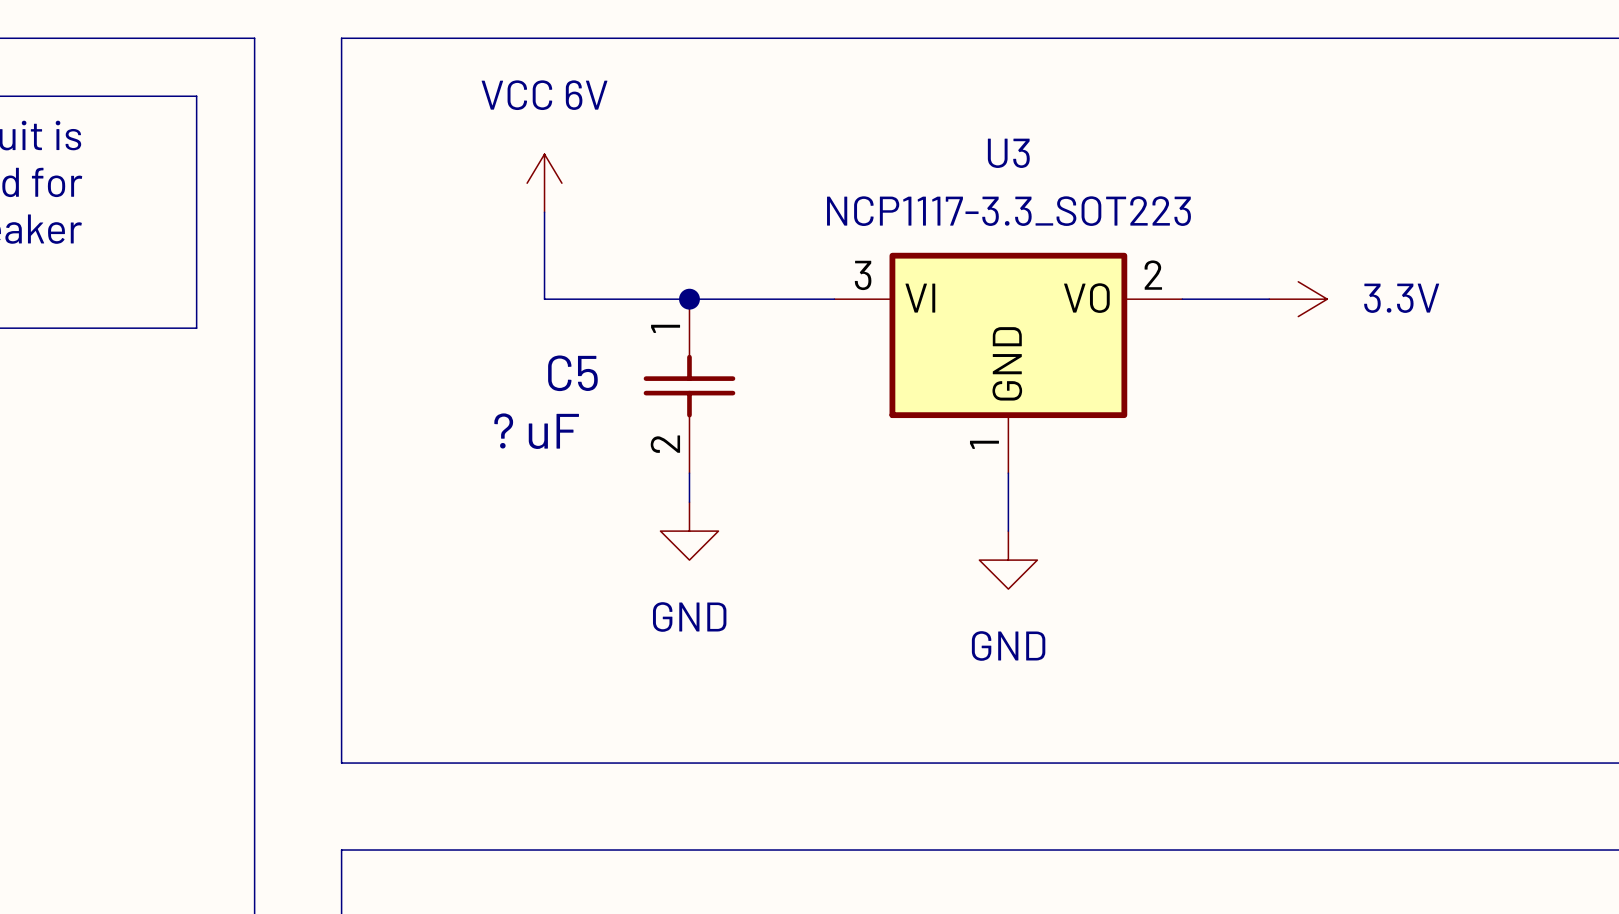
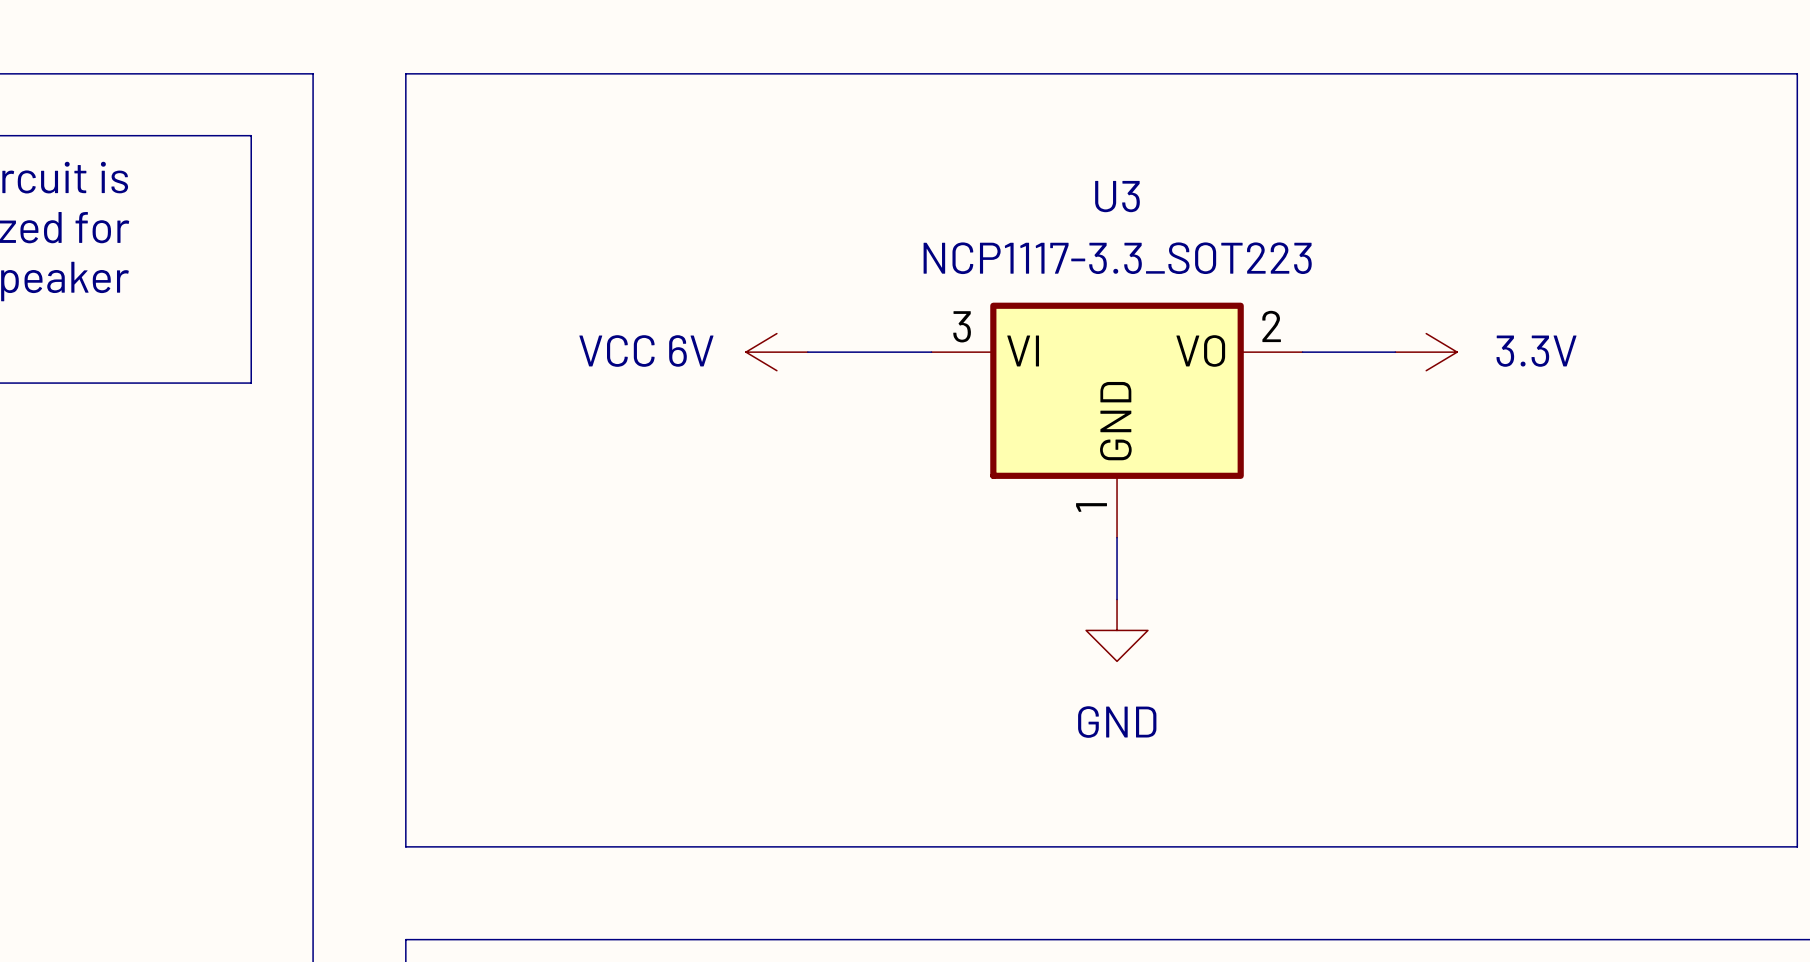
power symbol text position: VCC 6V (544, 95) -> VCC 6V (646, 351)
power symbol rotation: 0° (544, 183) -> 90° counterclockwise (776, 352)
power symbol position: VCC 6V (544, 183) -> VCC 6V (776, 352)
wire: (544, 212) (544, 299) (718, 299) -> none
junction: (689, 299) -> none
C5: ? uF (689, 386) -> none
wire: (689, 473) (689, 502) -> none
power symbol: GND (689, 531) -> none

